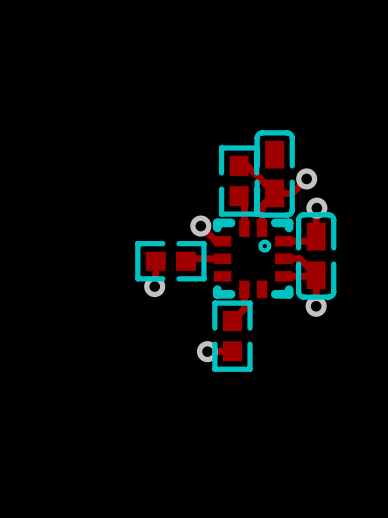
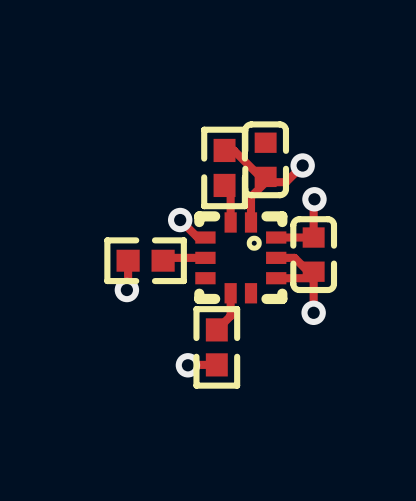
part footprint: [254, 130, 295, 218] -> [242, 121, 290, 199]
part footprint: [295, 212, 337, 300] -> [290, 216, 338, 294]

